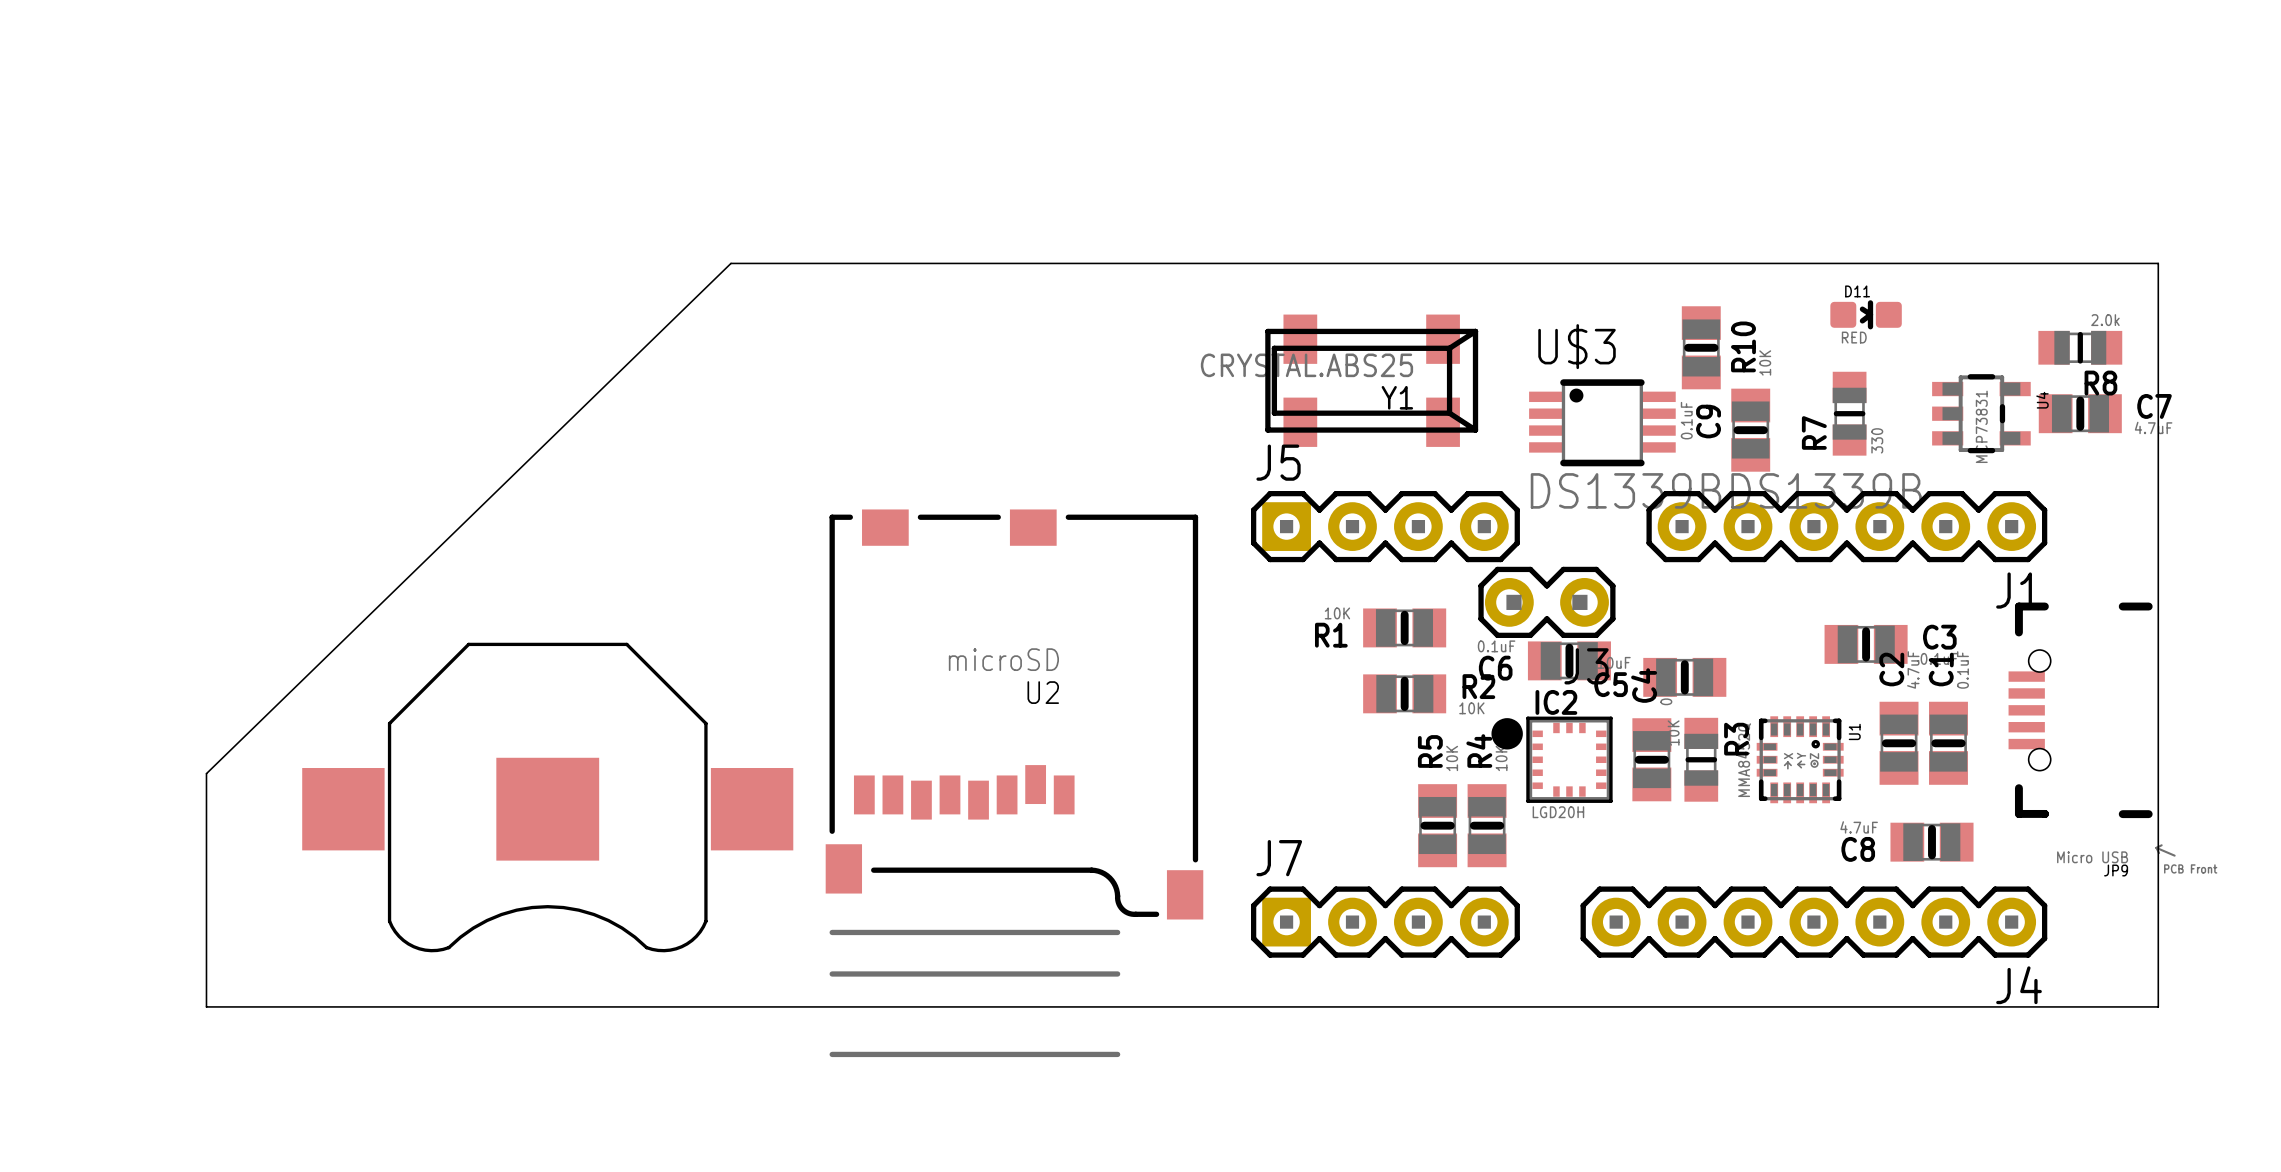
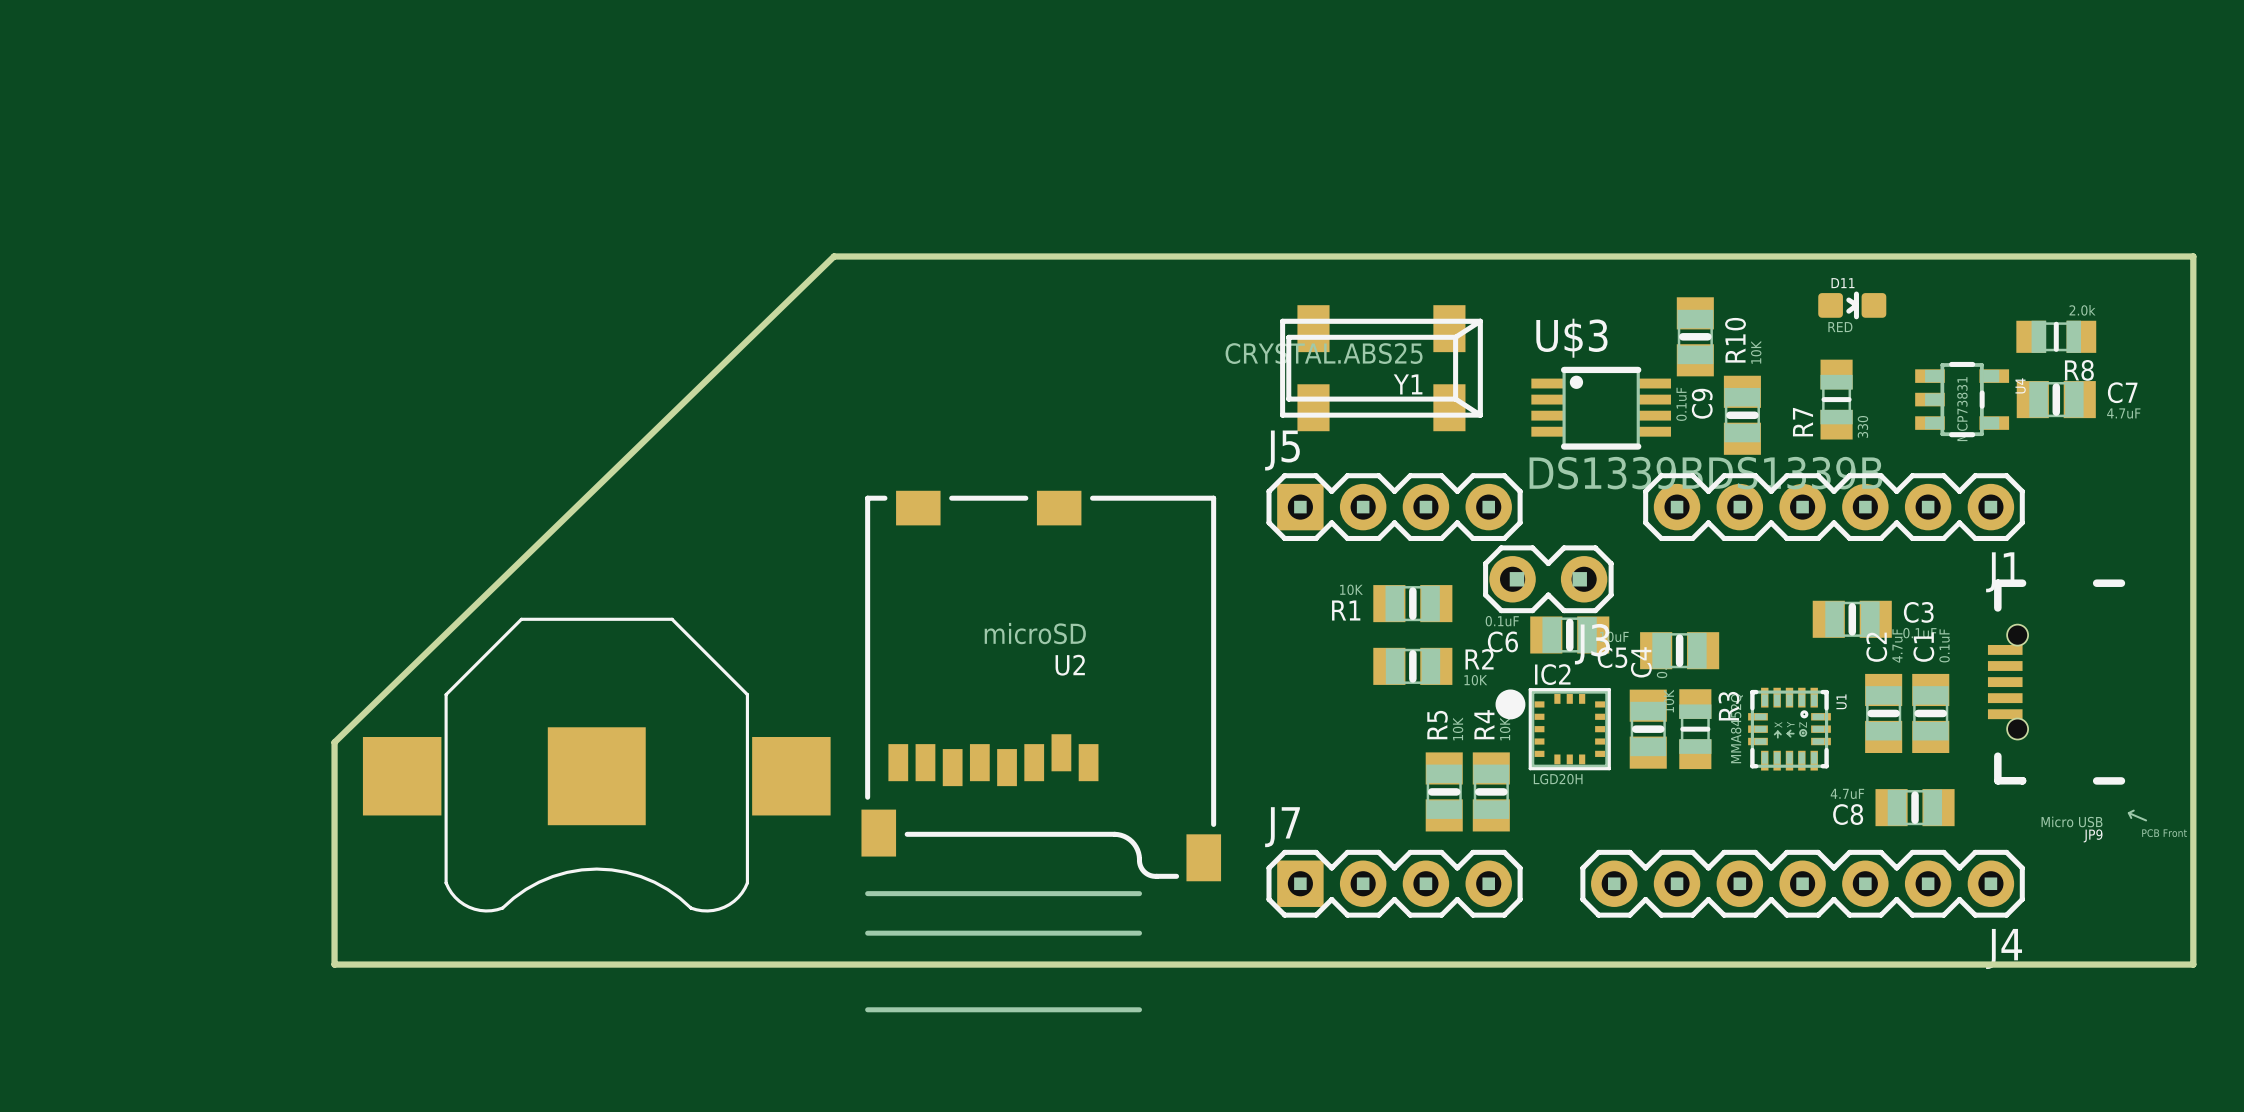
board edge: (796, 263) (730, 263) (206, 773) (206, 1006) (272, 1006) -> (834, 256) (334, 742) (334, 964)
board edge width: thin (796, 263) (2158, 263) -> thick (834, 256) (2130, 256)
board edge: (2158, 263) (2158, 1006) -> (2130, 256) (2193, 256) (2193, 964) (2130, 964)
board edge width: thin (272, 1006) (2158, 1006) -> thick (334, 964) (2130, 964)

